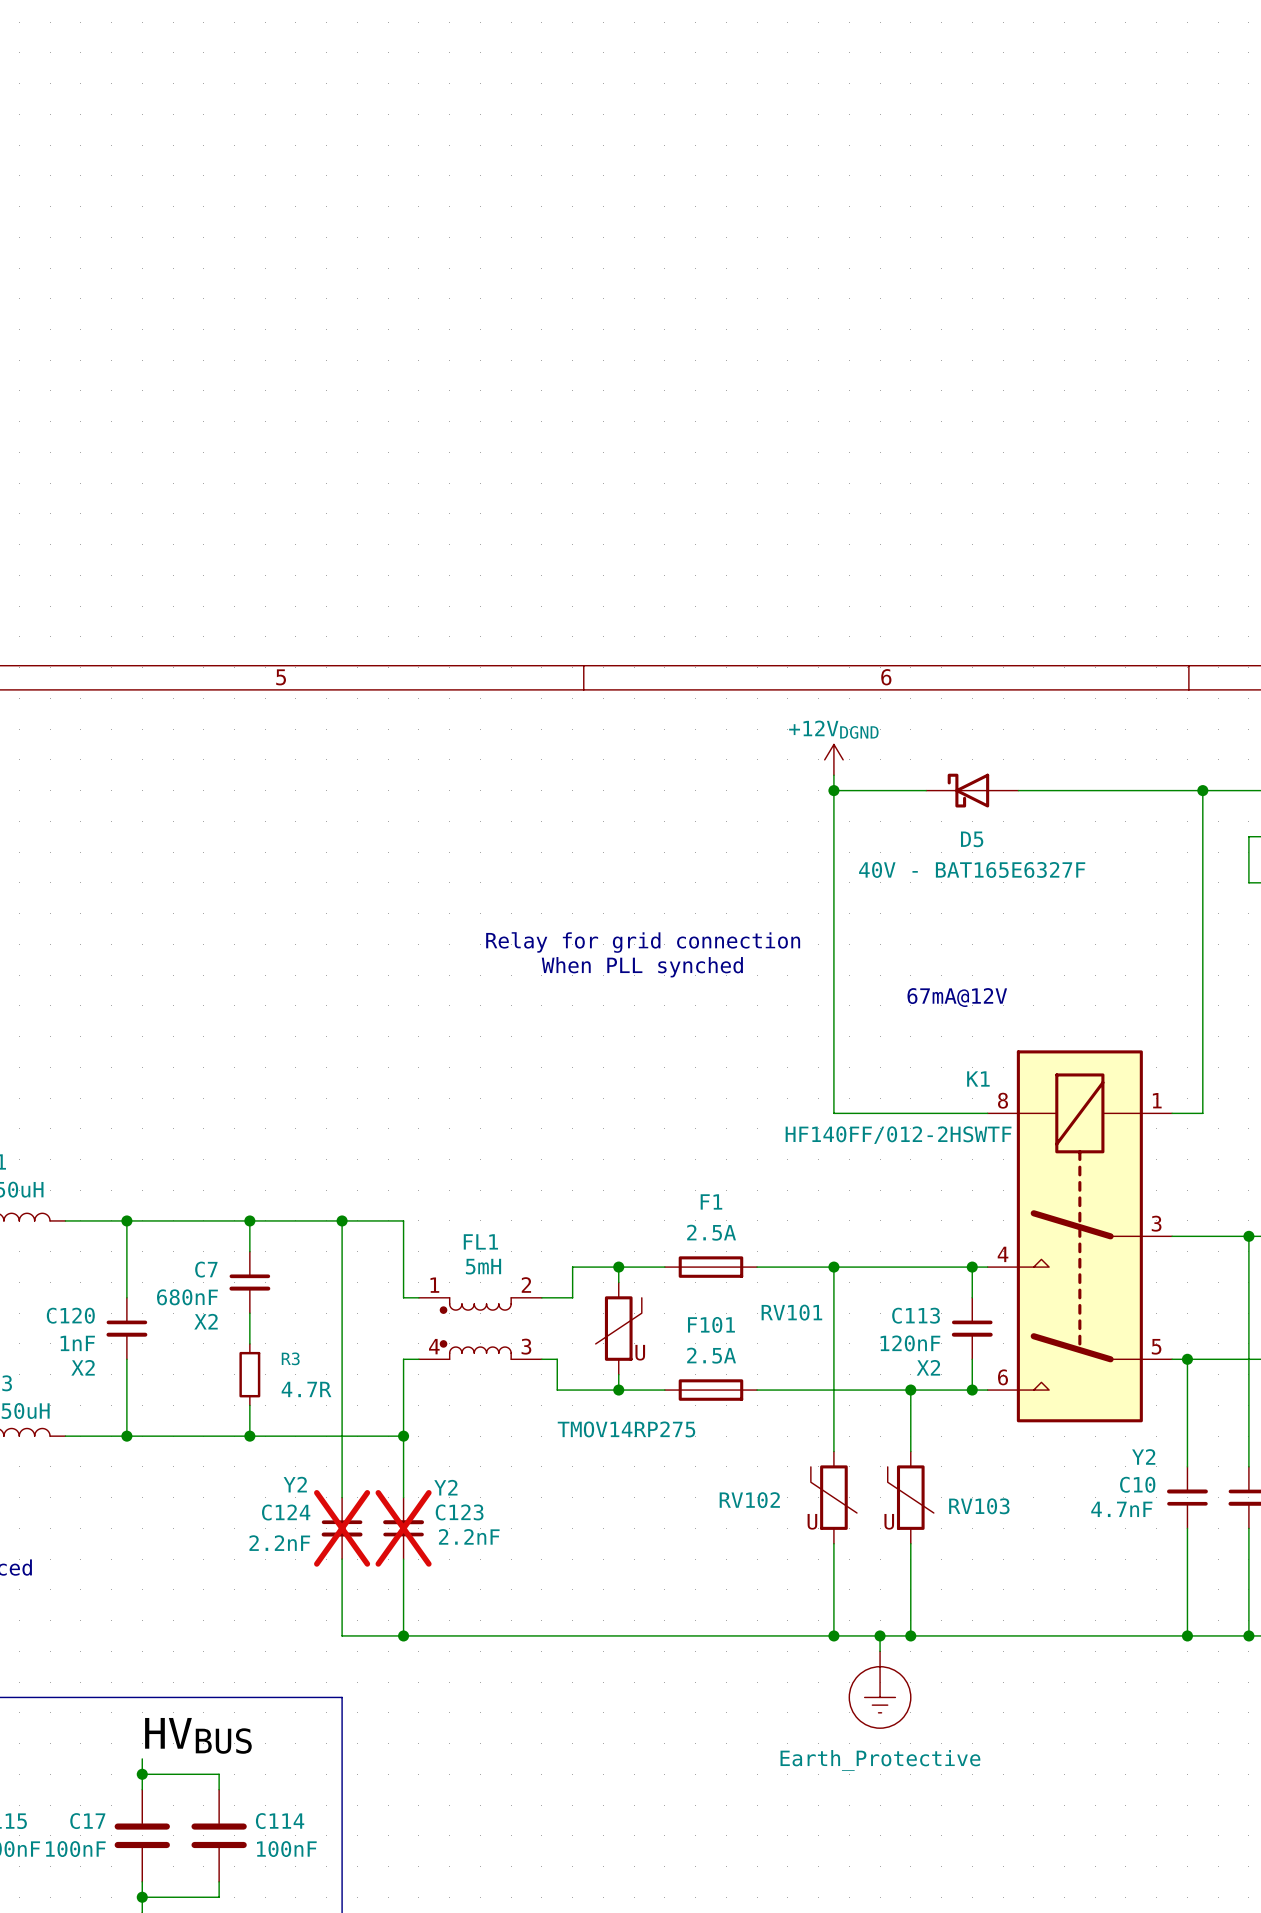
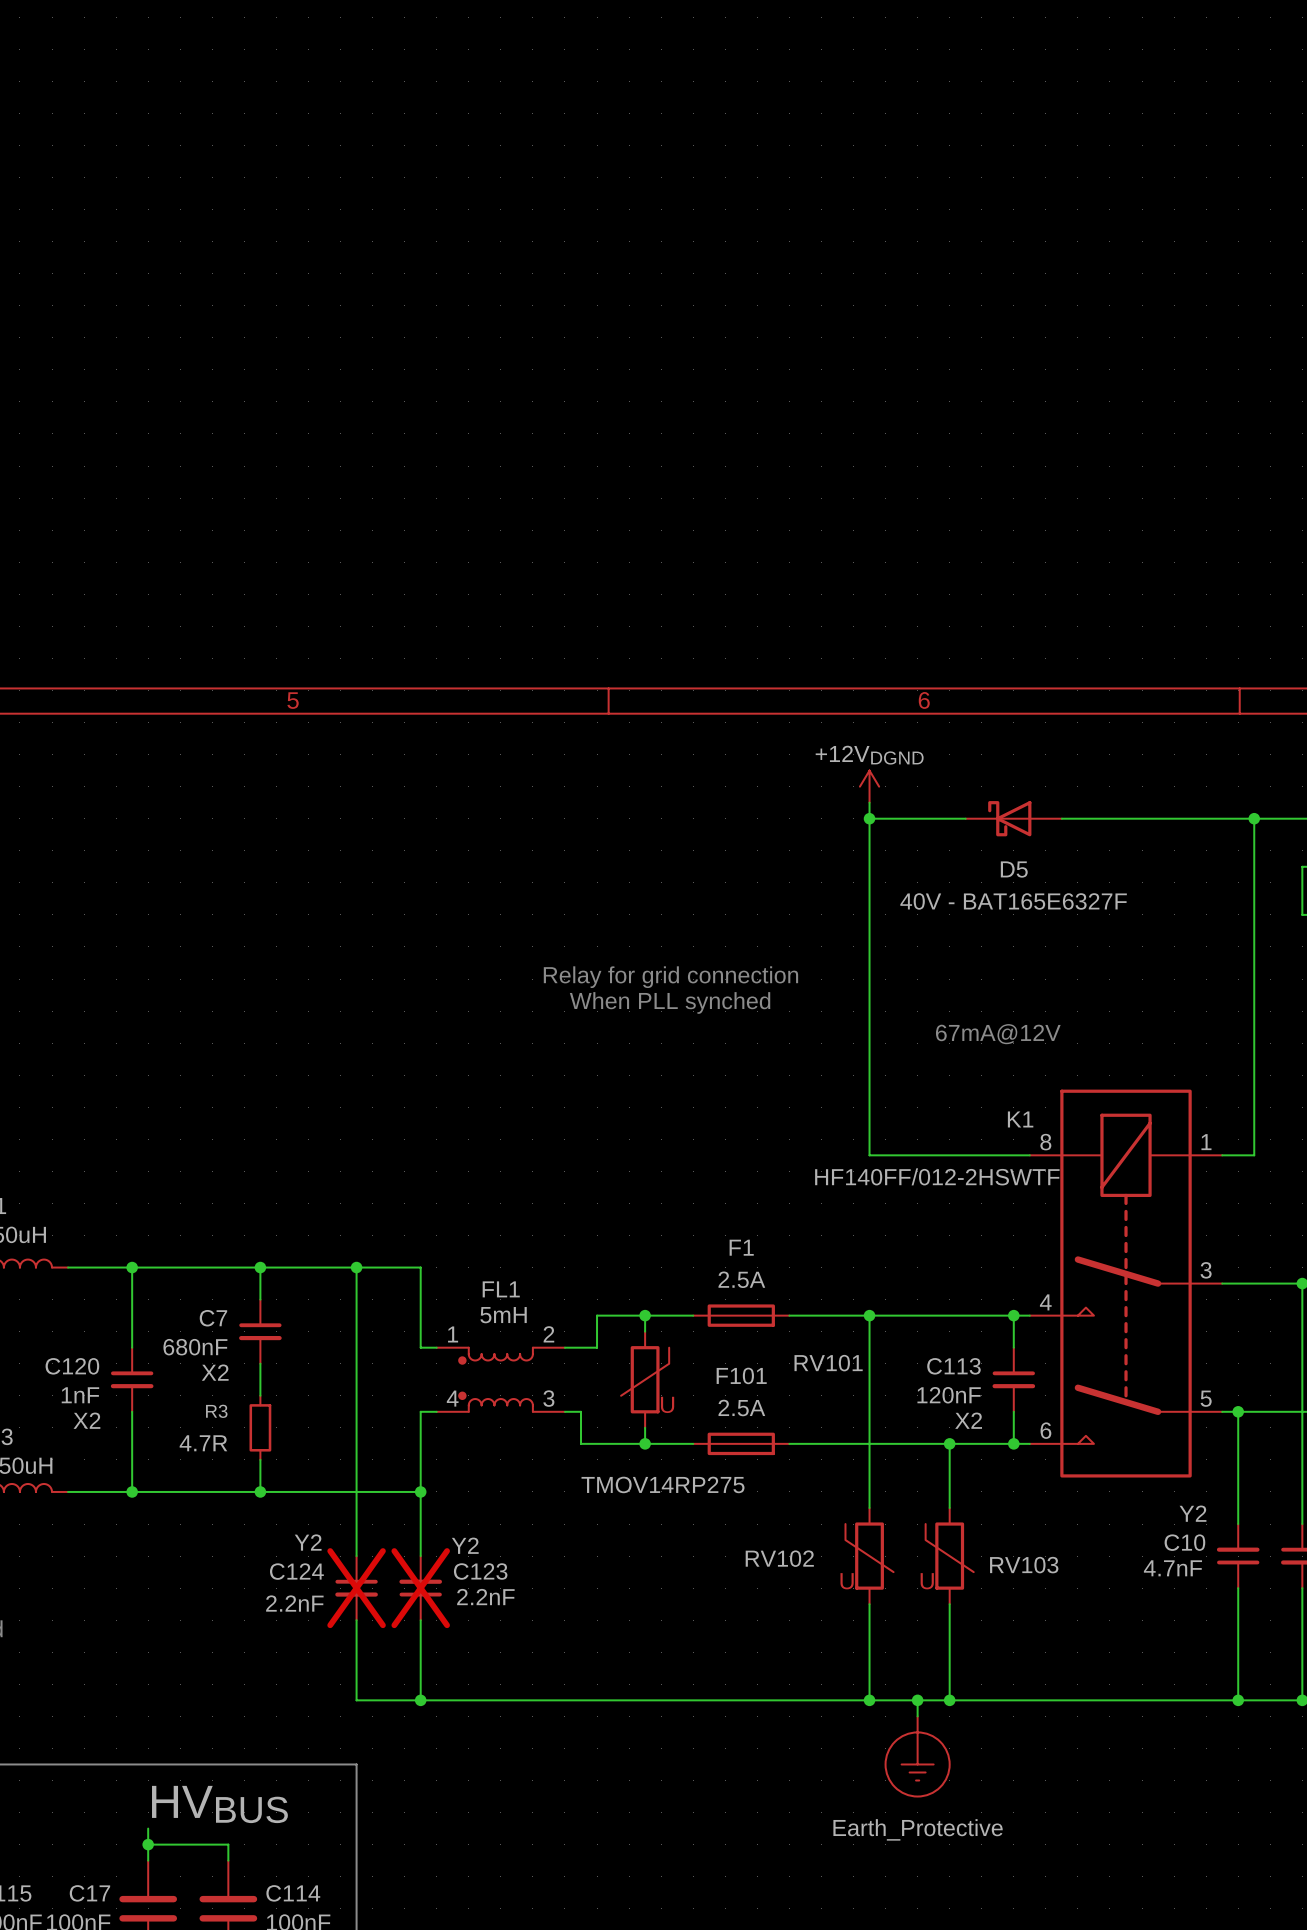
R3 name position: R3 (290, 1358) -> R3 (216, 1411)
R3 value position: 4.7R (306, 1389) -> 4.7R (203, 1443)

